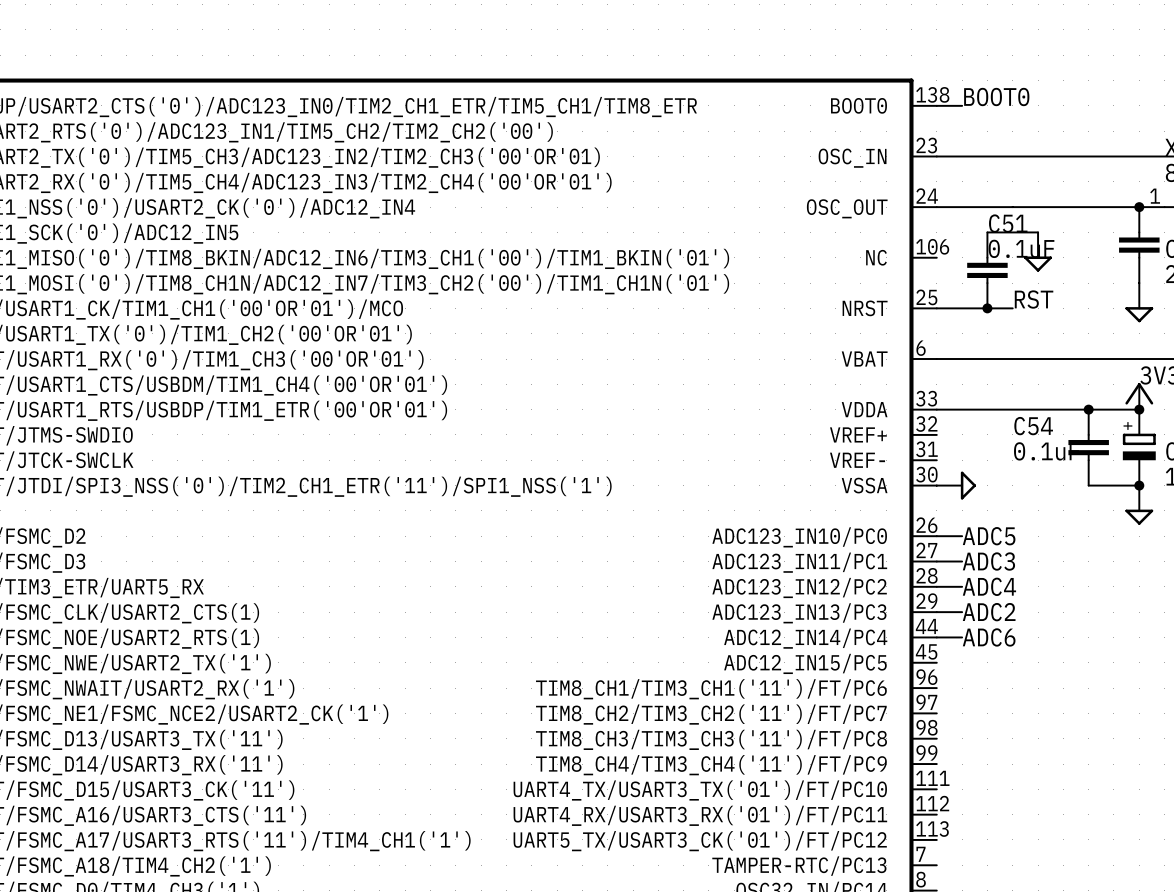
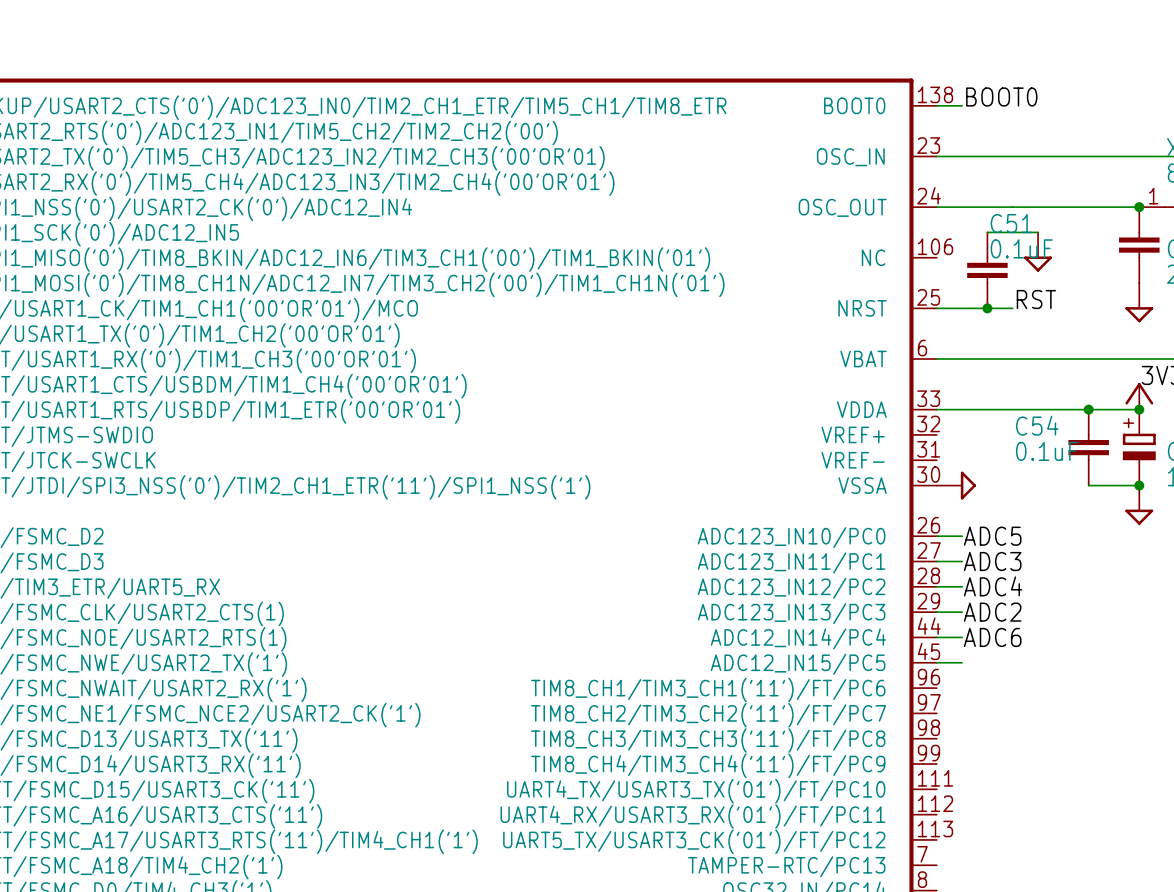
wire: none -> (936, 662) (962, 662)

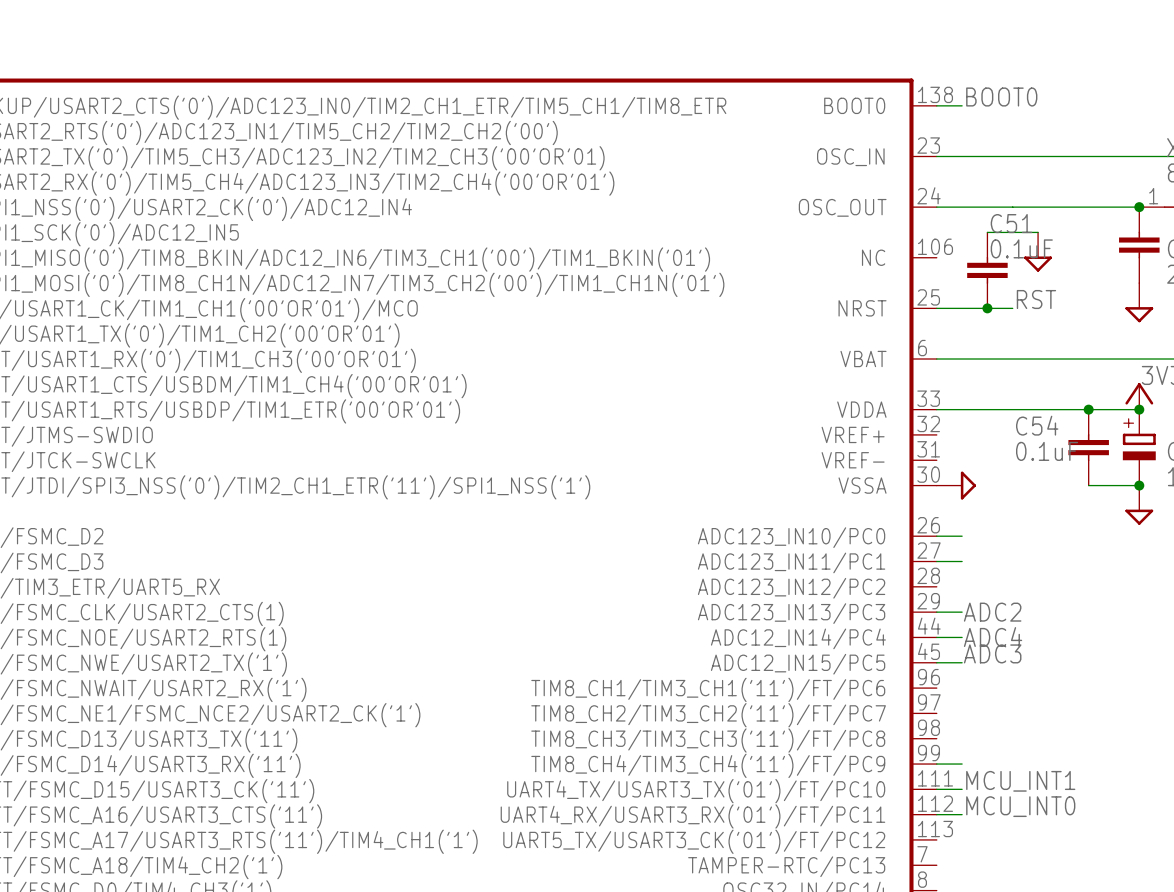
label: ADC5 (992, 536) -> none
label position: ADC3 (992, 561) -> ADC3 (992, 653)
wire: (936, 586) (962, 586) -> (936, 764) (962, 764)
label: ADC4 (993, 586) -> none
label: ADC6 (992, 637) -> ADC4 (993, 637)
label: none -> MCU_INT1 (1020, 781)
wire: none -> (936, 789) (962, 789)
label: none -> MCU_INT0 (1020, 806)
wire: none -> (936, 814) (962, 814)

